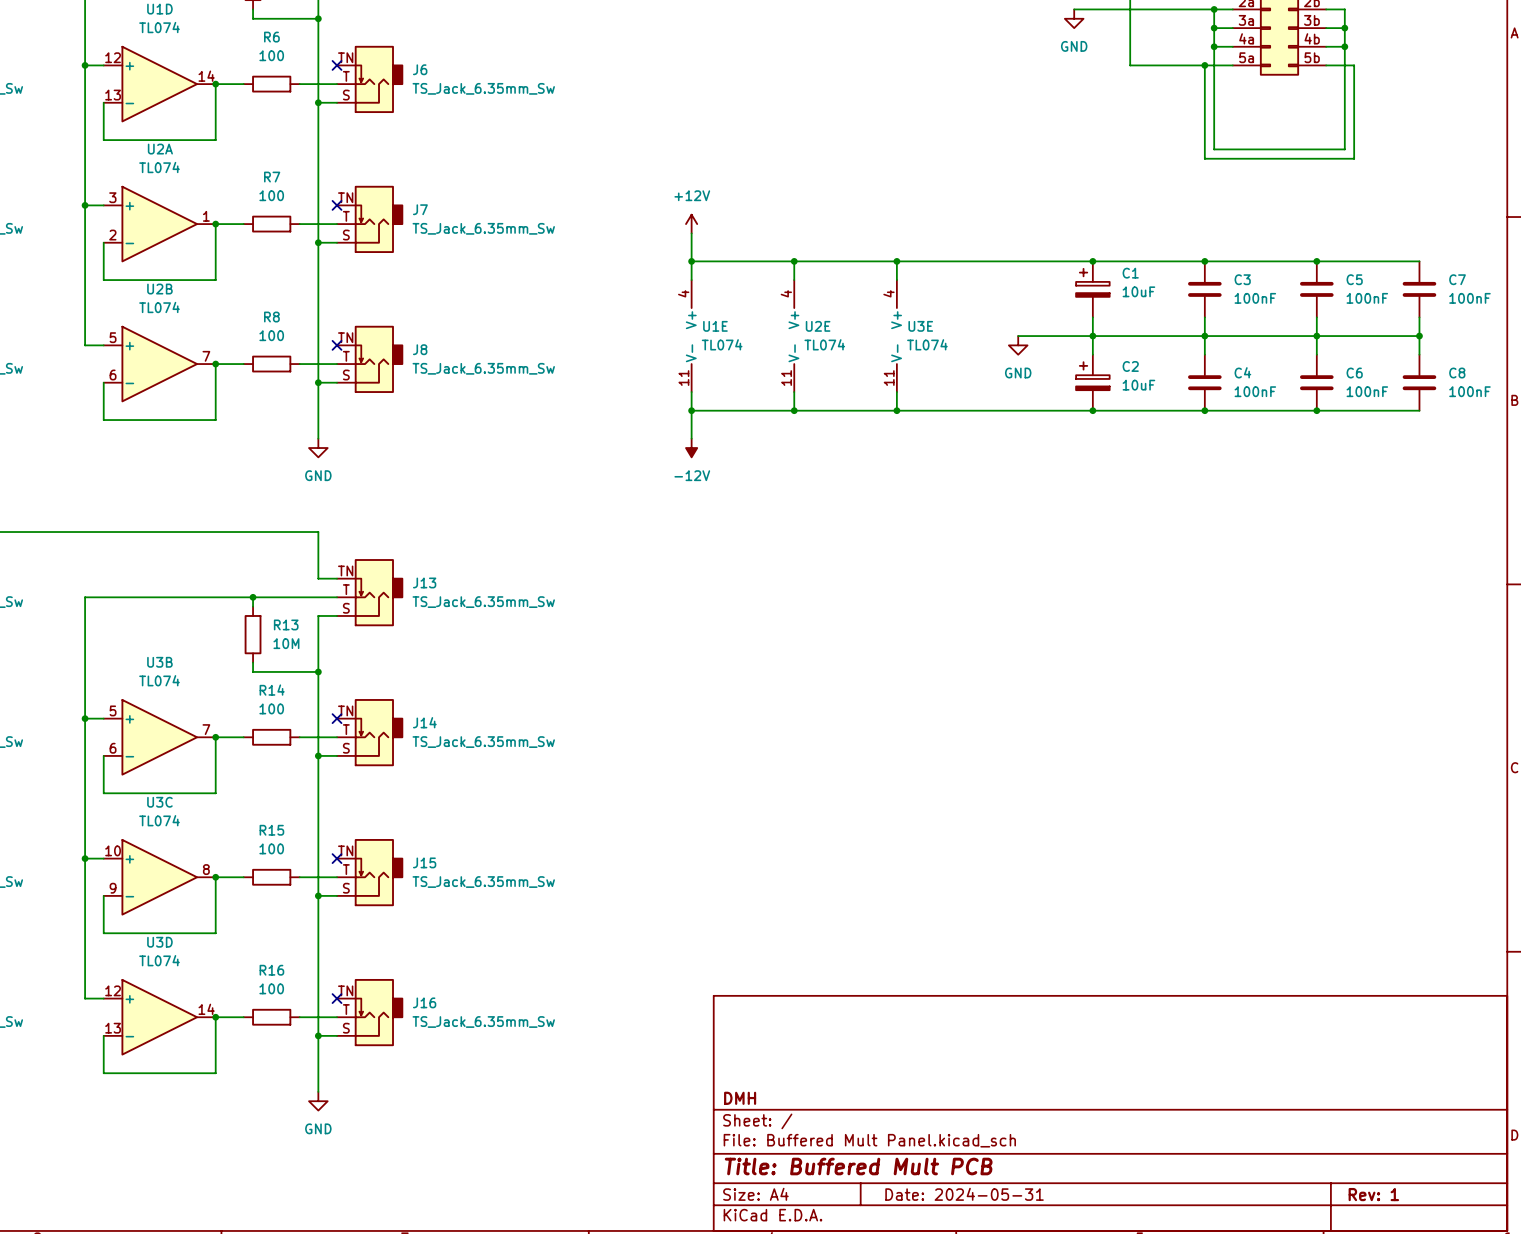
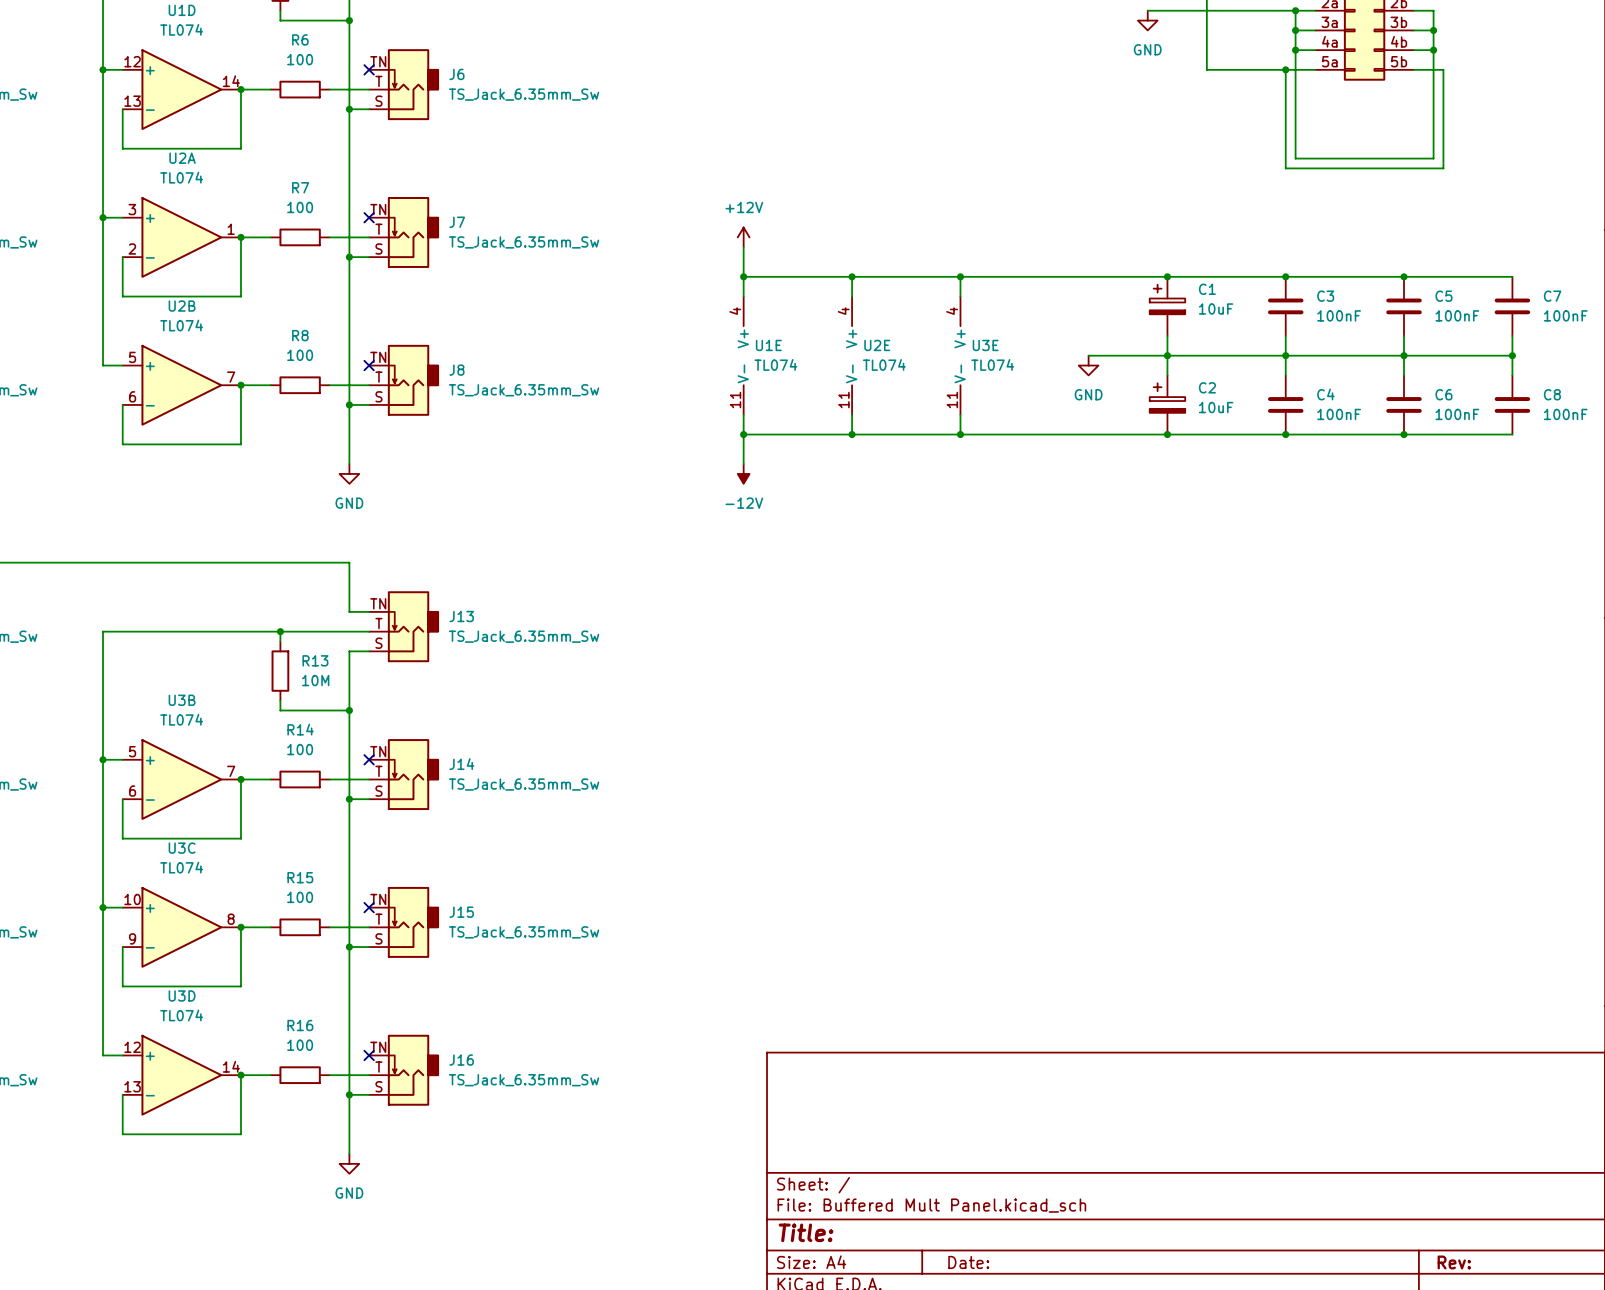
title block: DMH (740, 1098) -> none
title block: Title: Buffered Mult PCB (858, 1166) -> Title: (806, 1232)
title block: Date: 2024-05-31 (964, 1194) -> Date: (968, 1262)
title block: Rev: 1 (1373, 1194) -> Rev: (1454, 1262)

